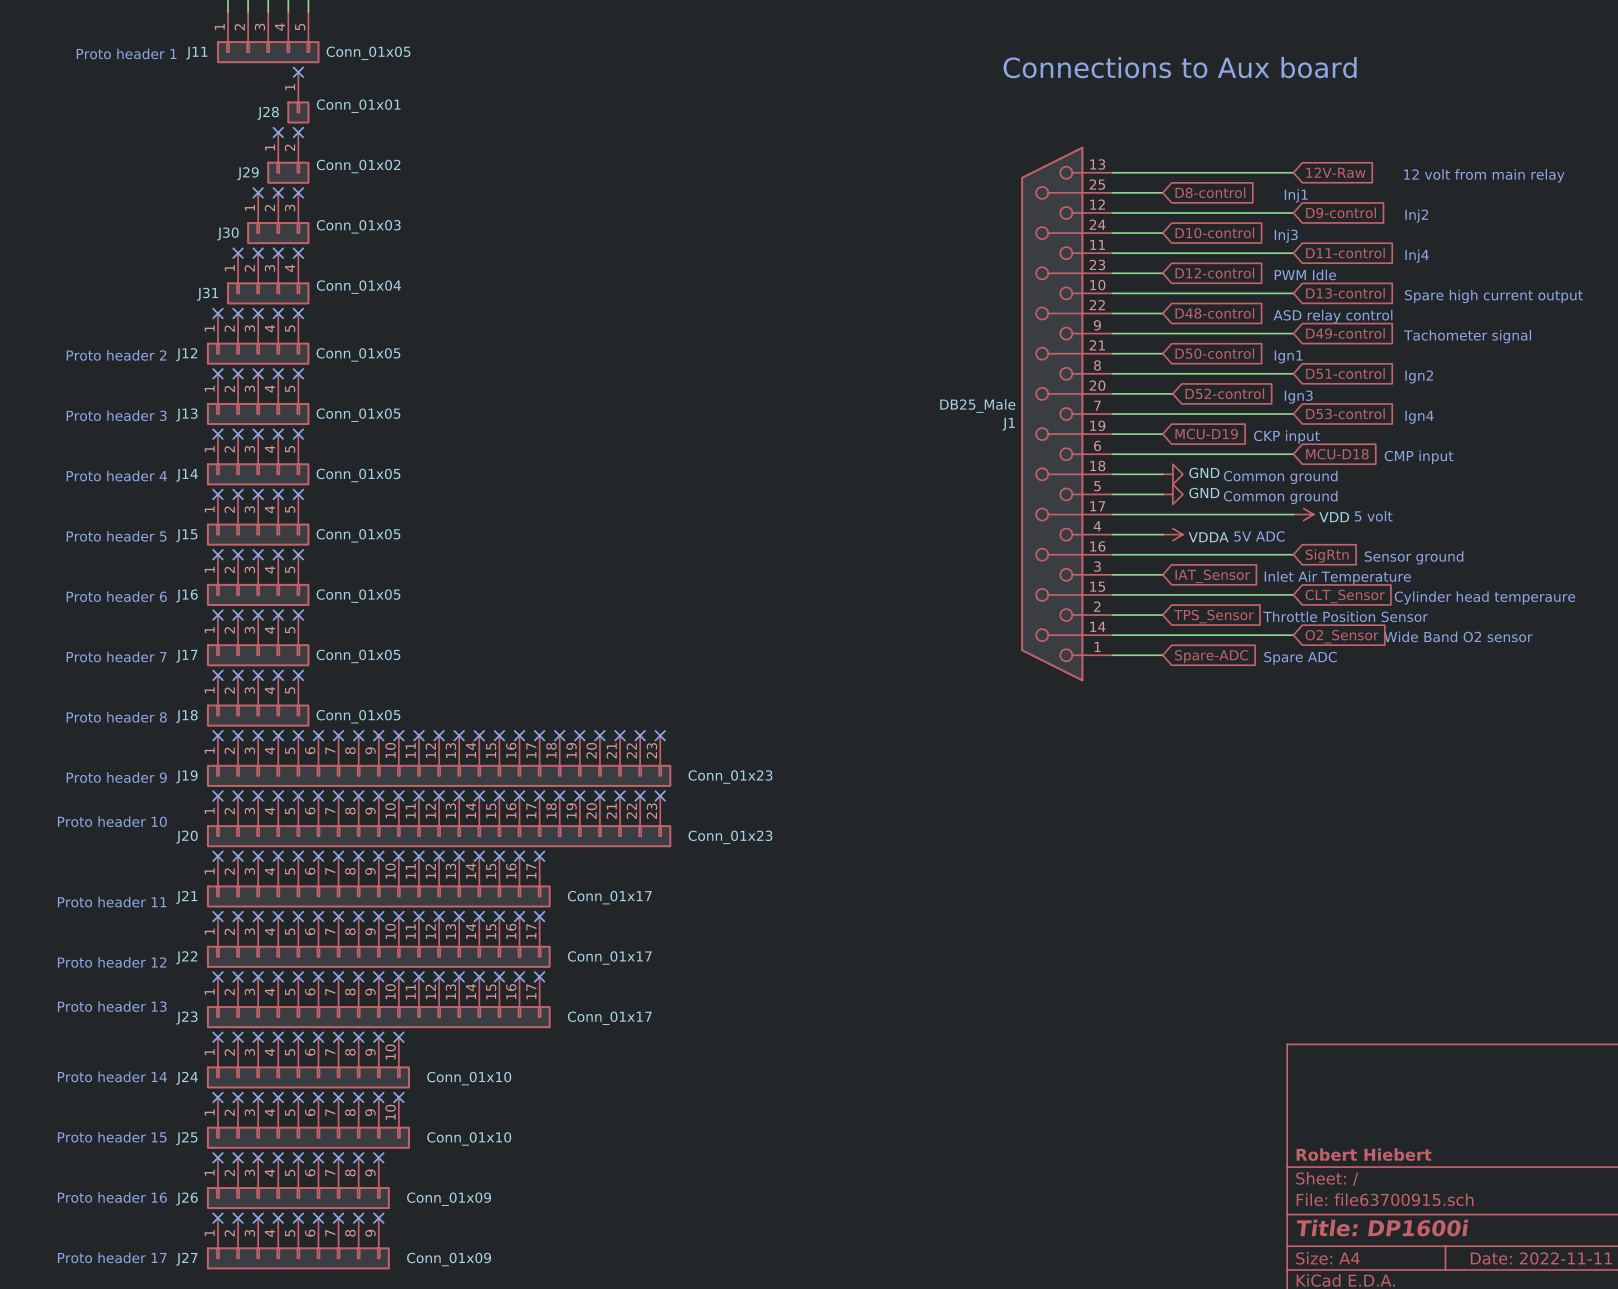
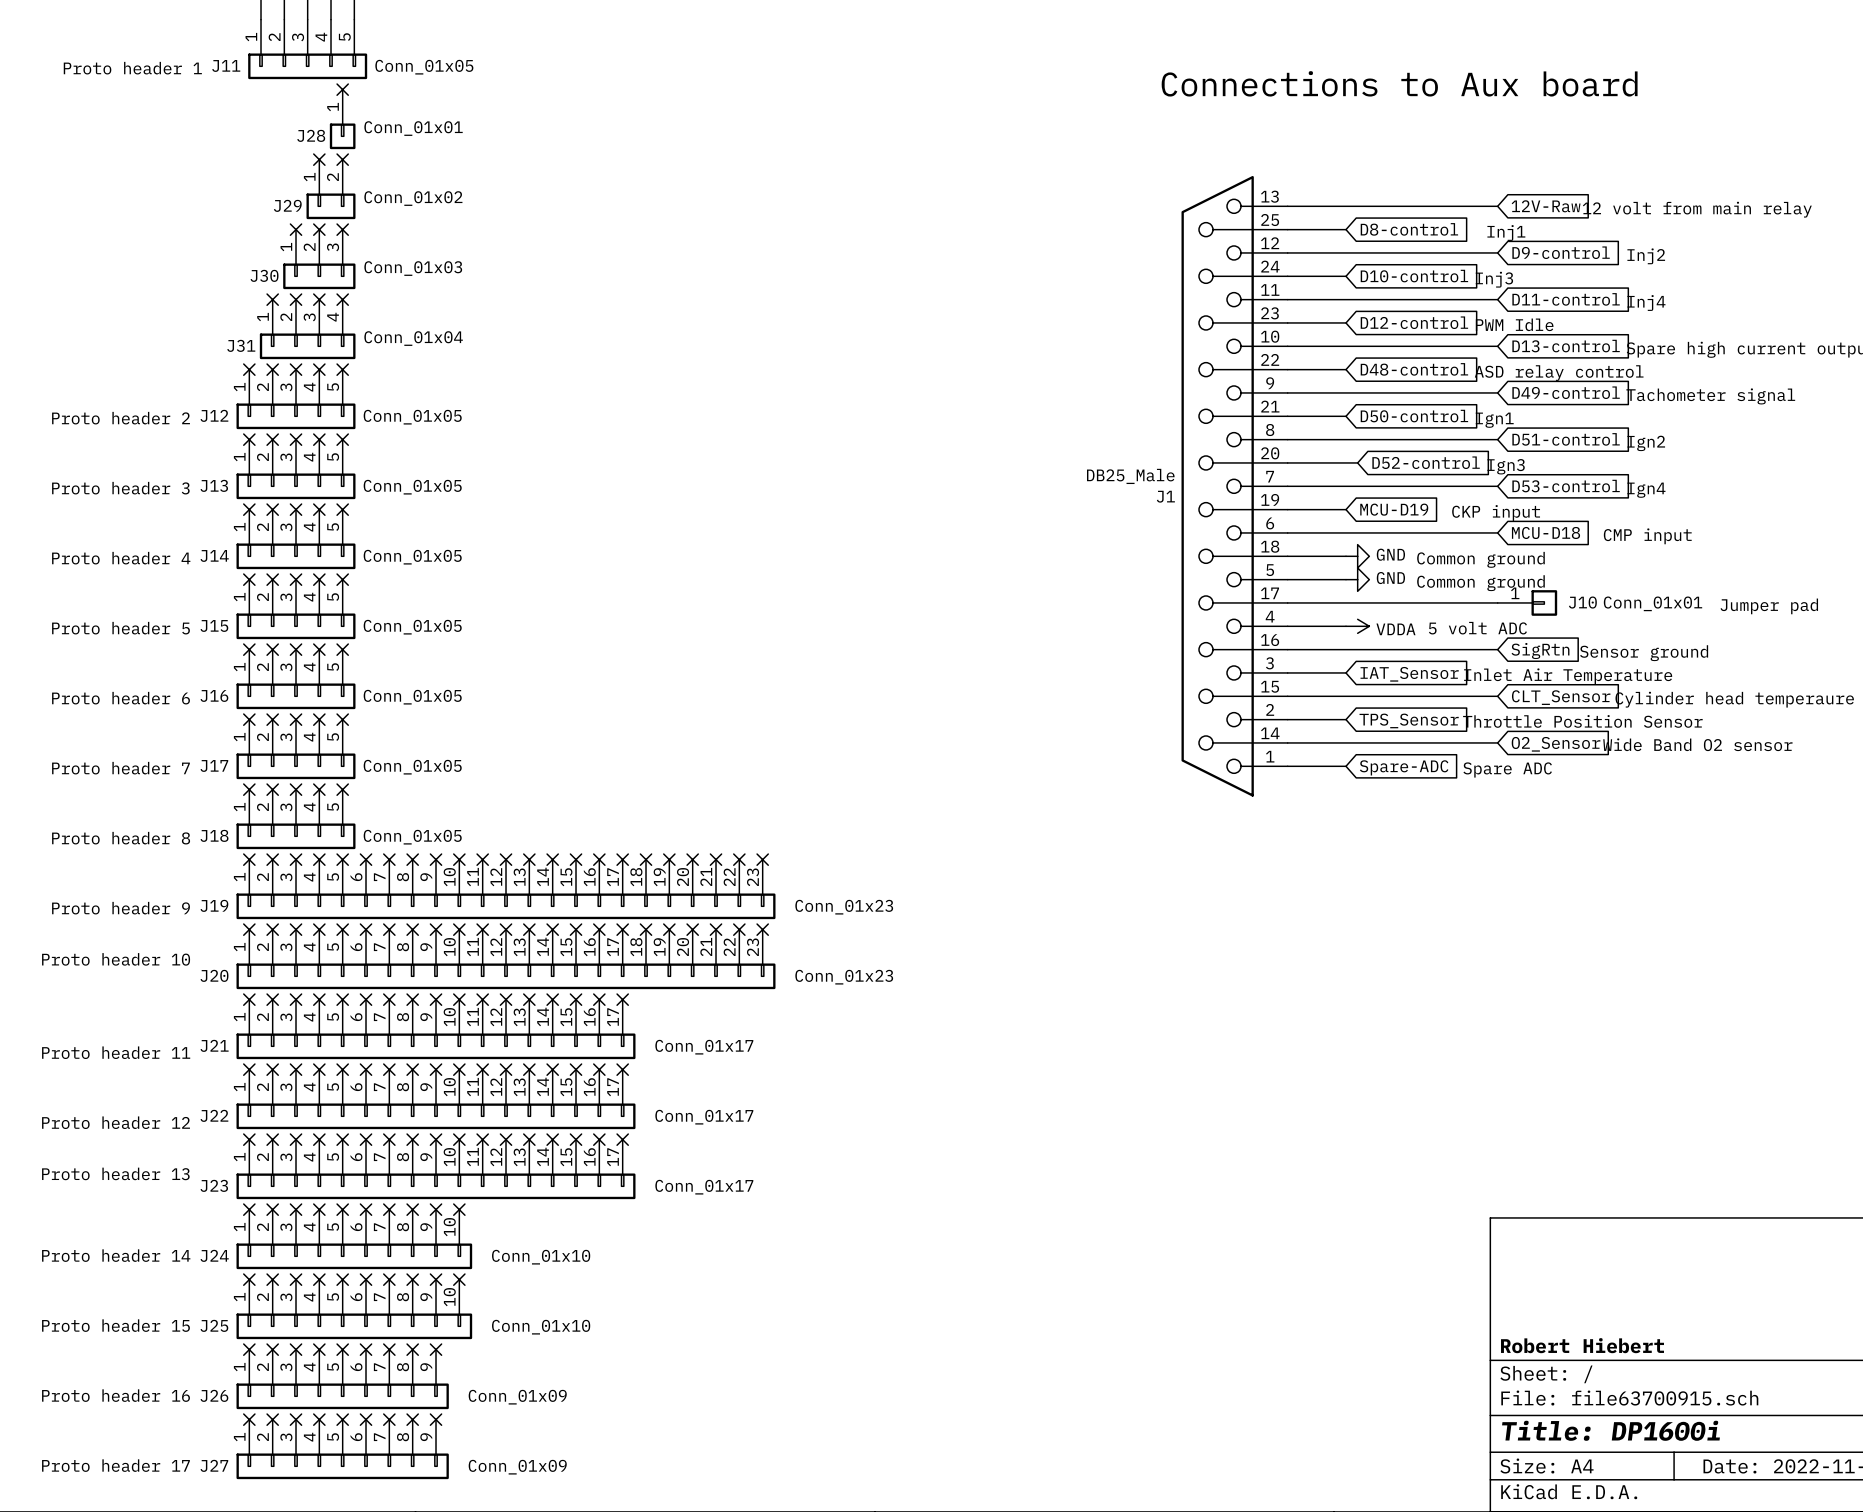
power symbol: VDD (1303, 514) -> none
J10: none -> Conn_01x01 (1527, 602)
text: 5 volt (1373, 516) -> none
text: none -> Jumper pad (1769, 606)
text: 5V ADC (1259, 536) -> 5 volt ADC (1477, 628)

